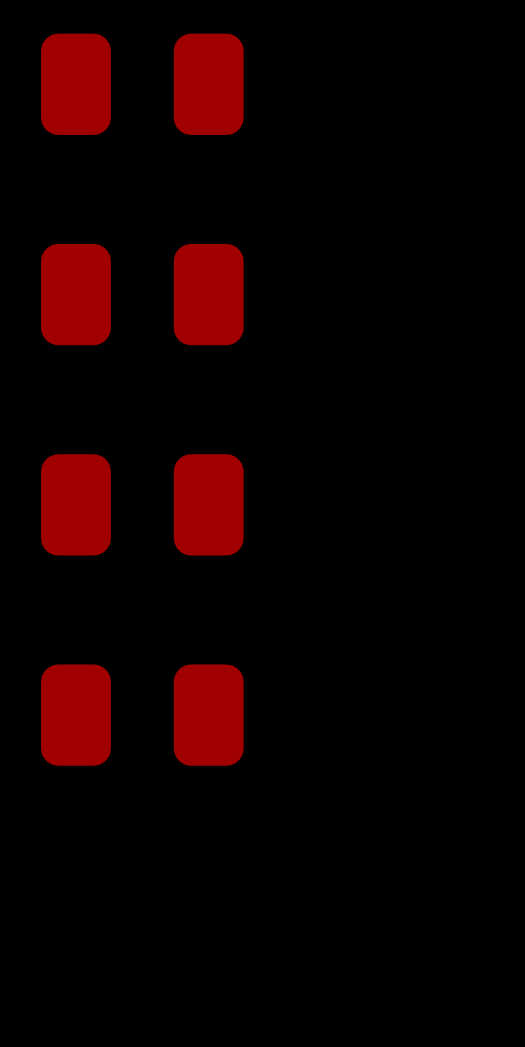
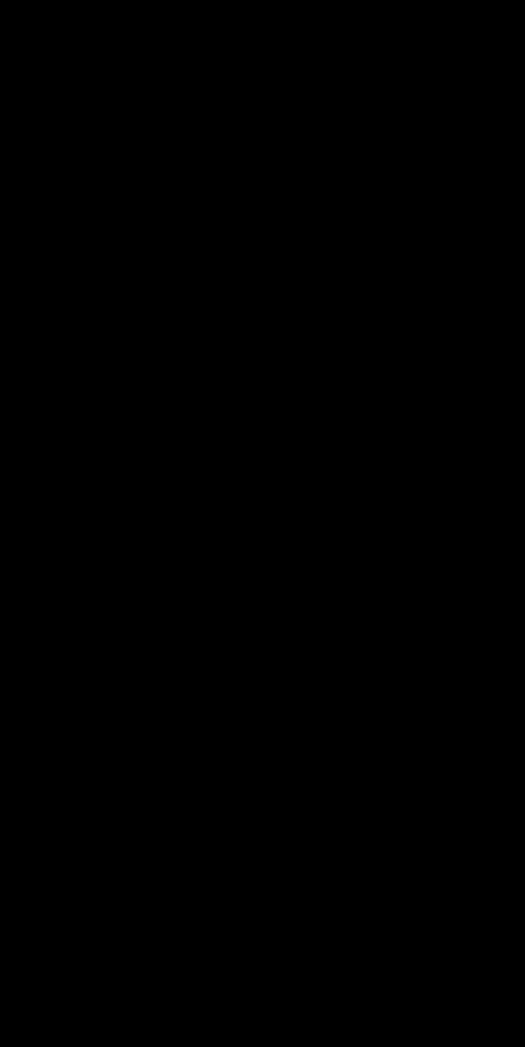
part: (142, 84) -> none
part: (142, 294) -> none
part: (142, 504) -> none
part: (142, 715) -> none

